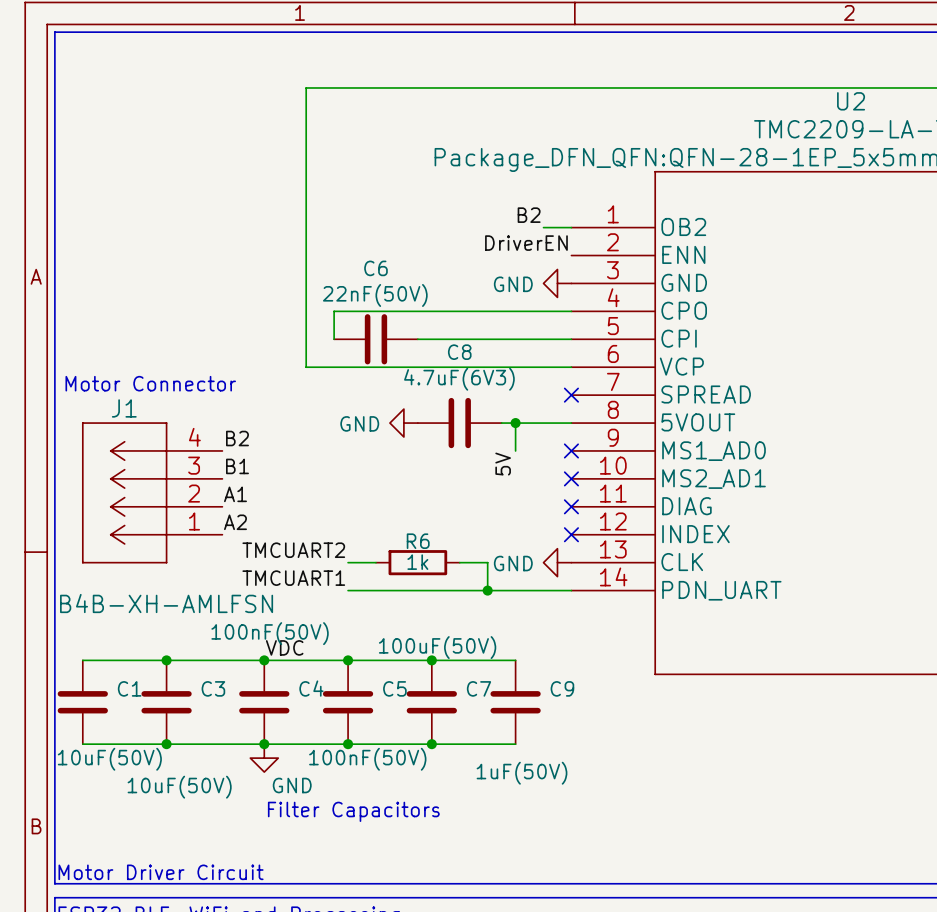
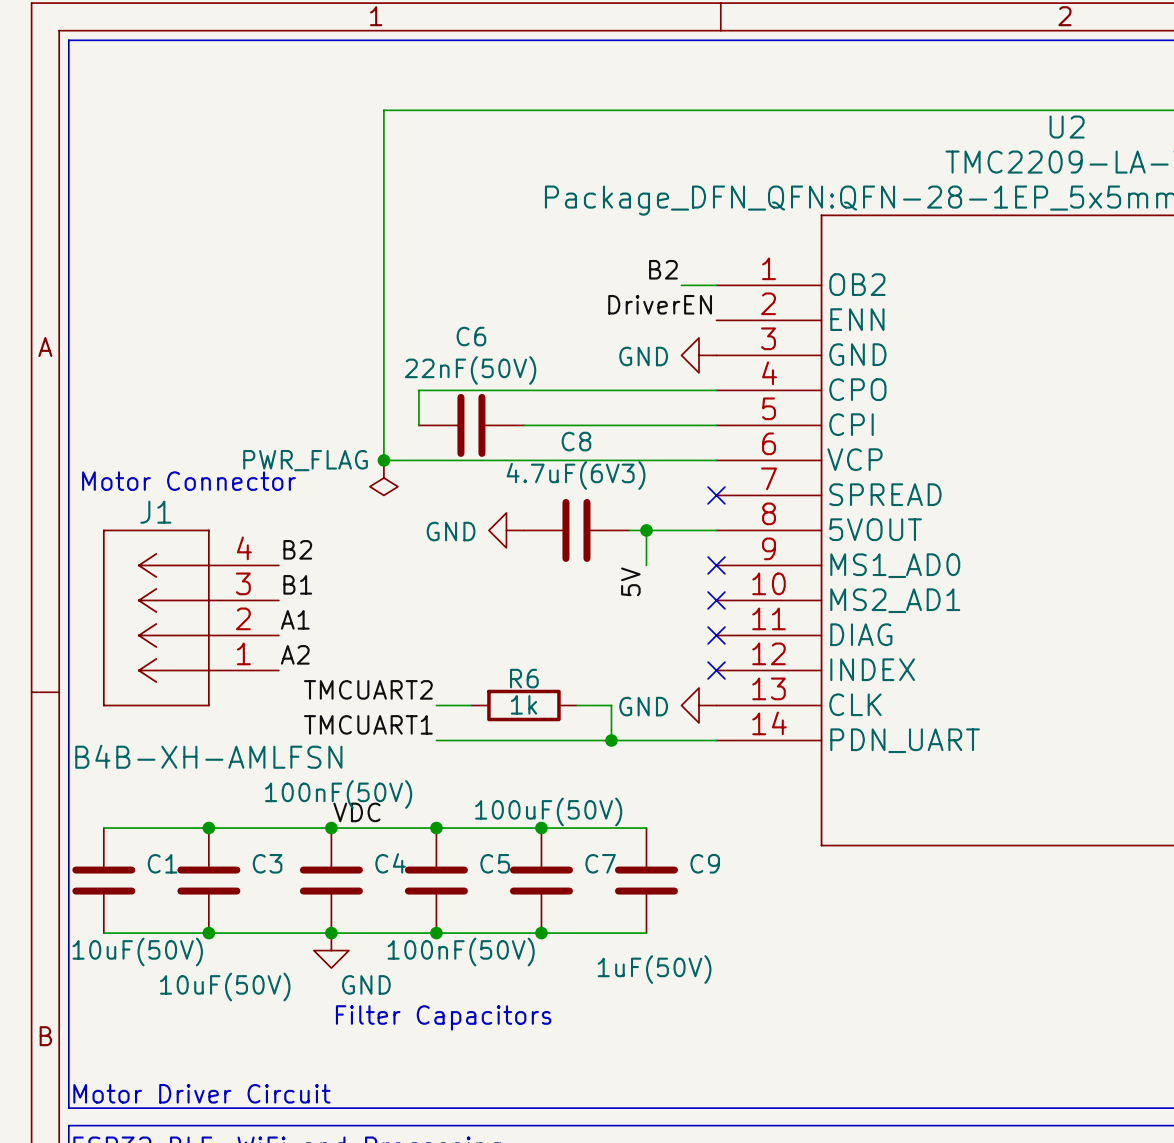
junction: none -> (383, 460)
power symbol: none -> PWR_FLAG (383, 477)

